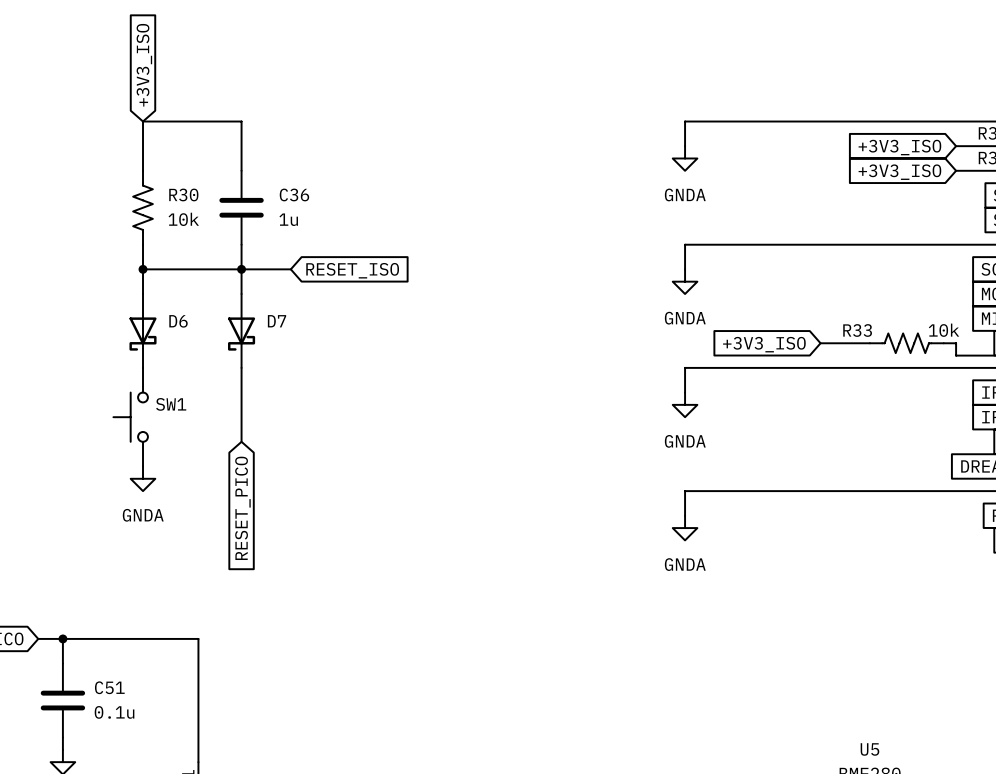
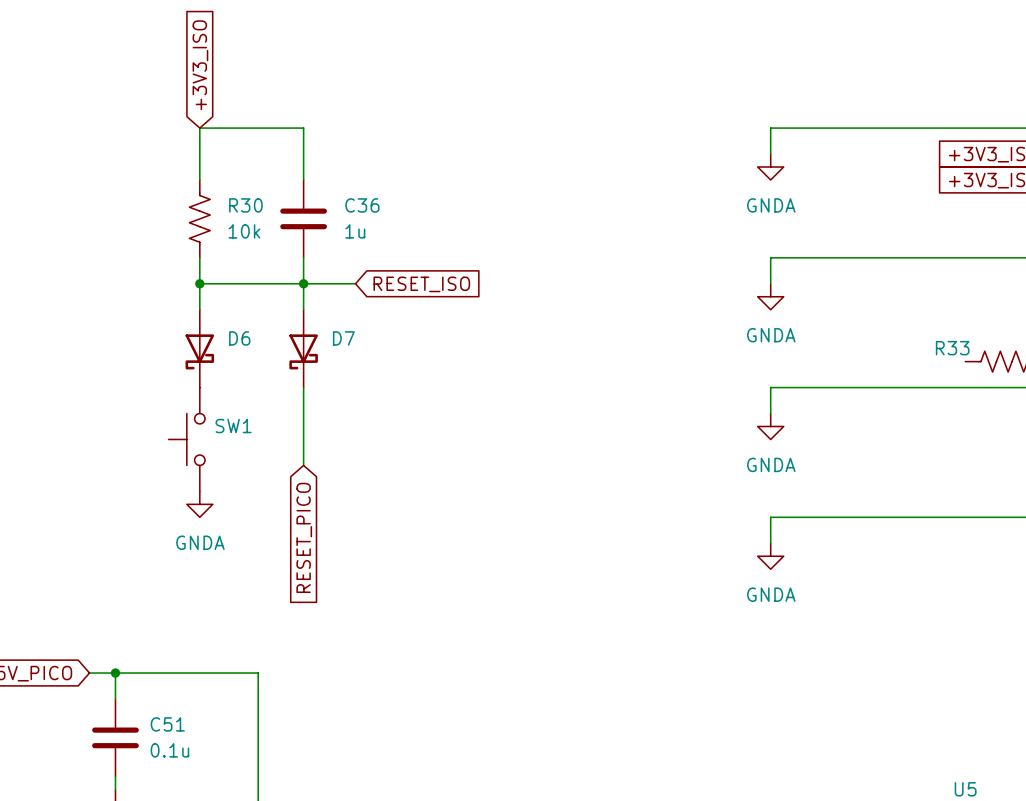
wire: (820, 343) (869, 343) -> none
global label: +3V3_ISO (764, 344) -> none

